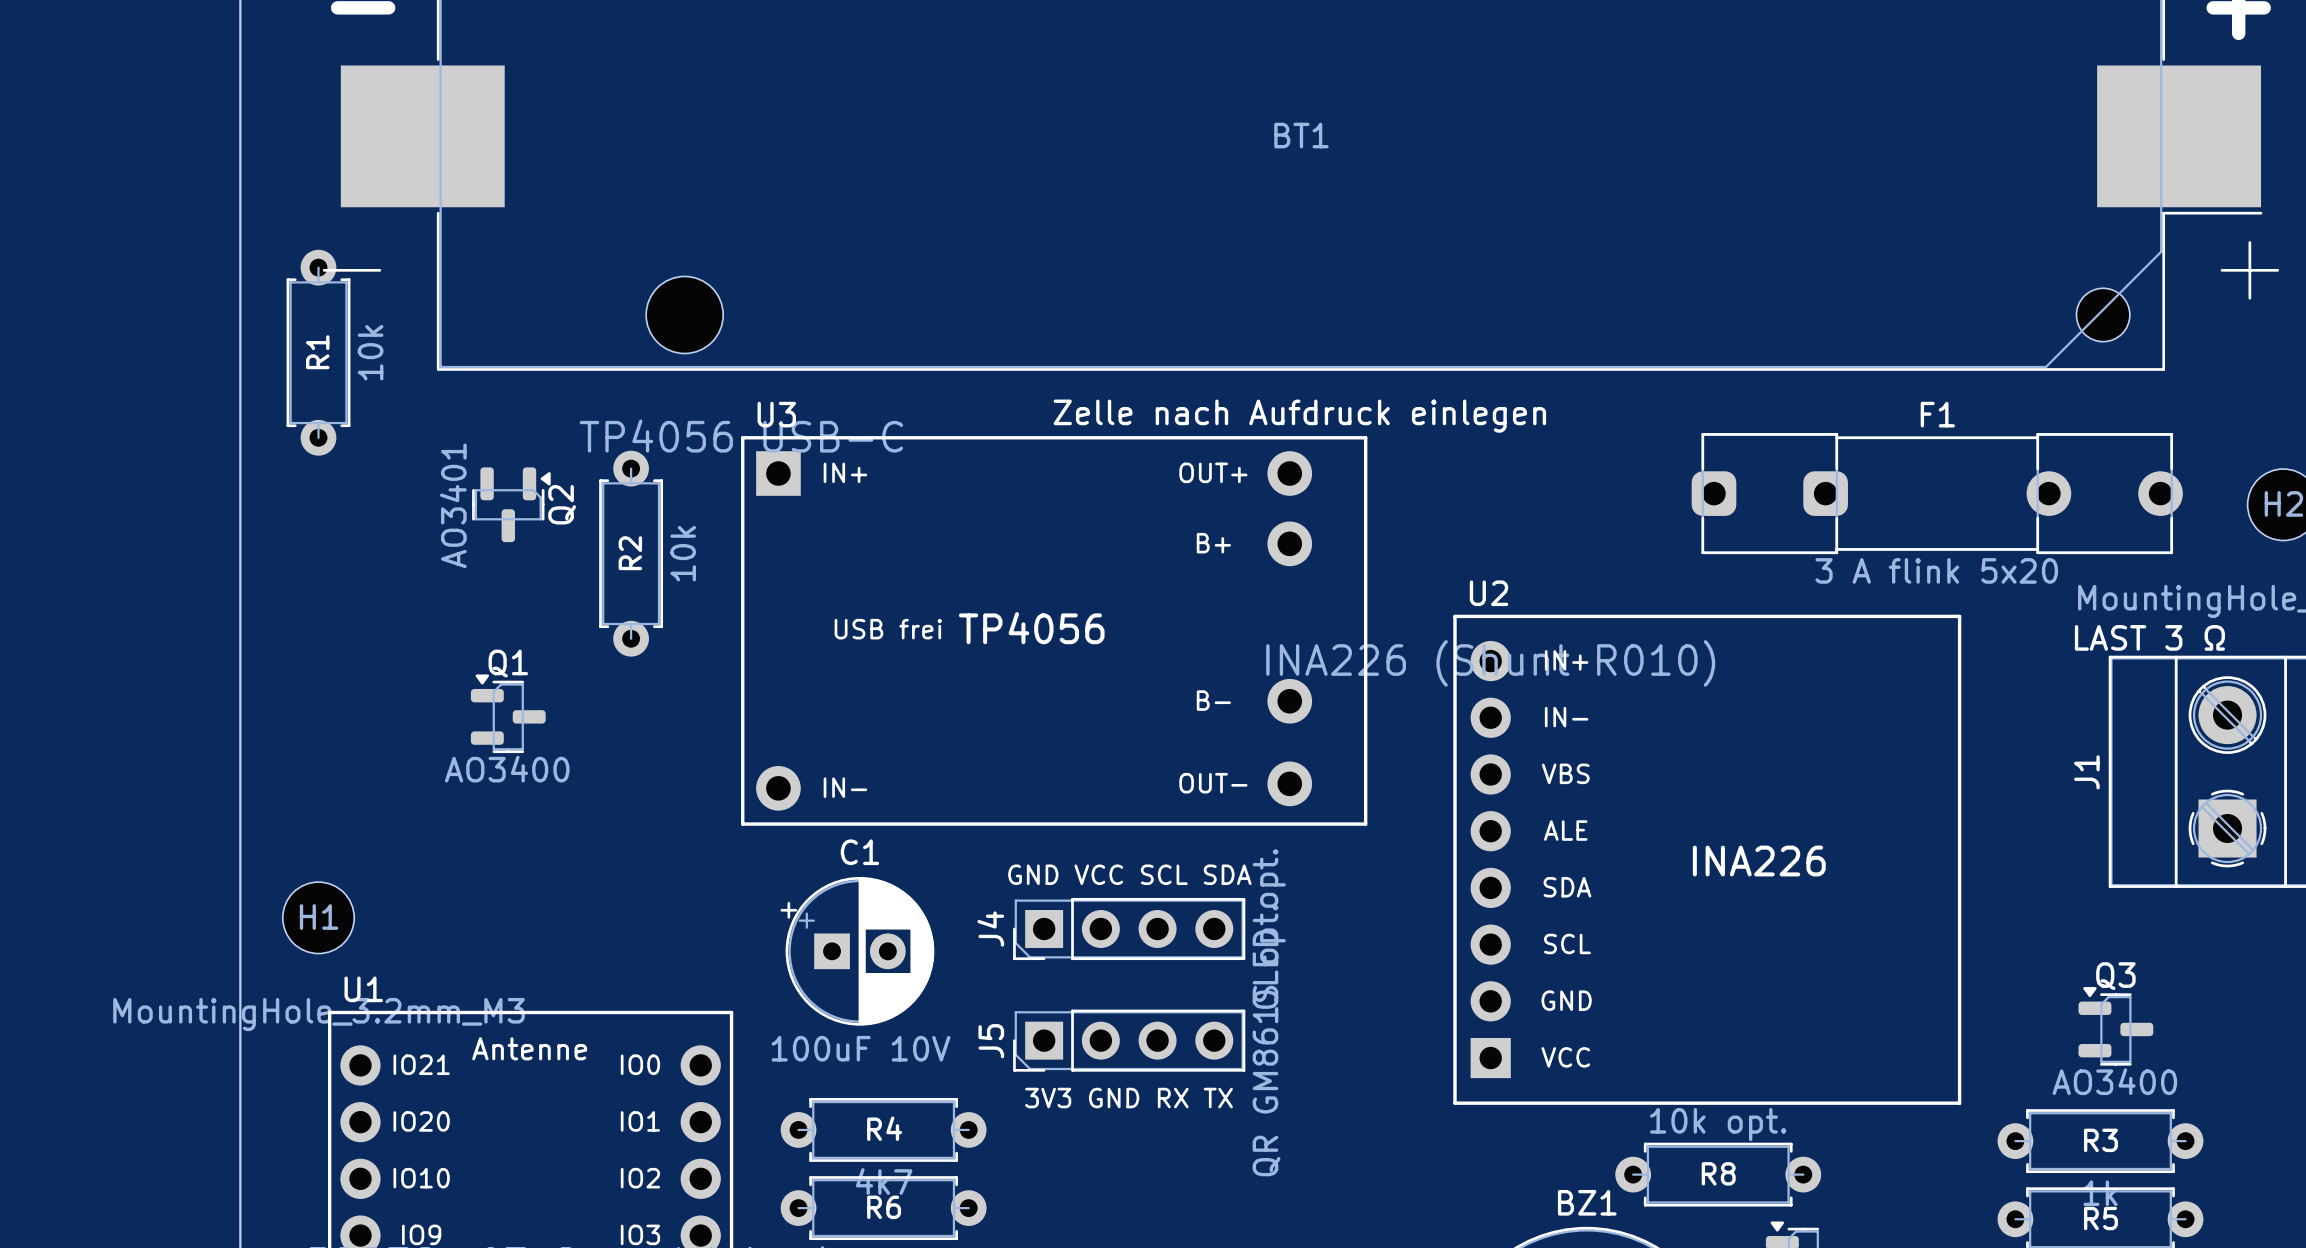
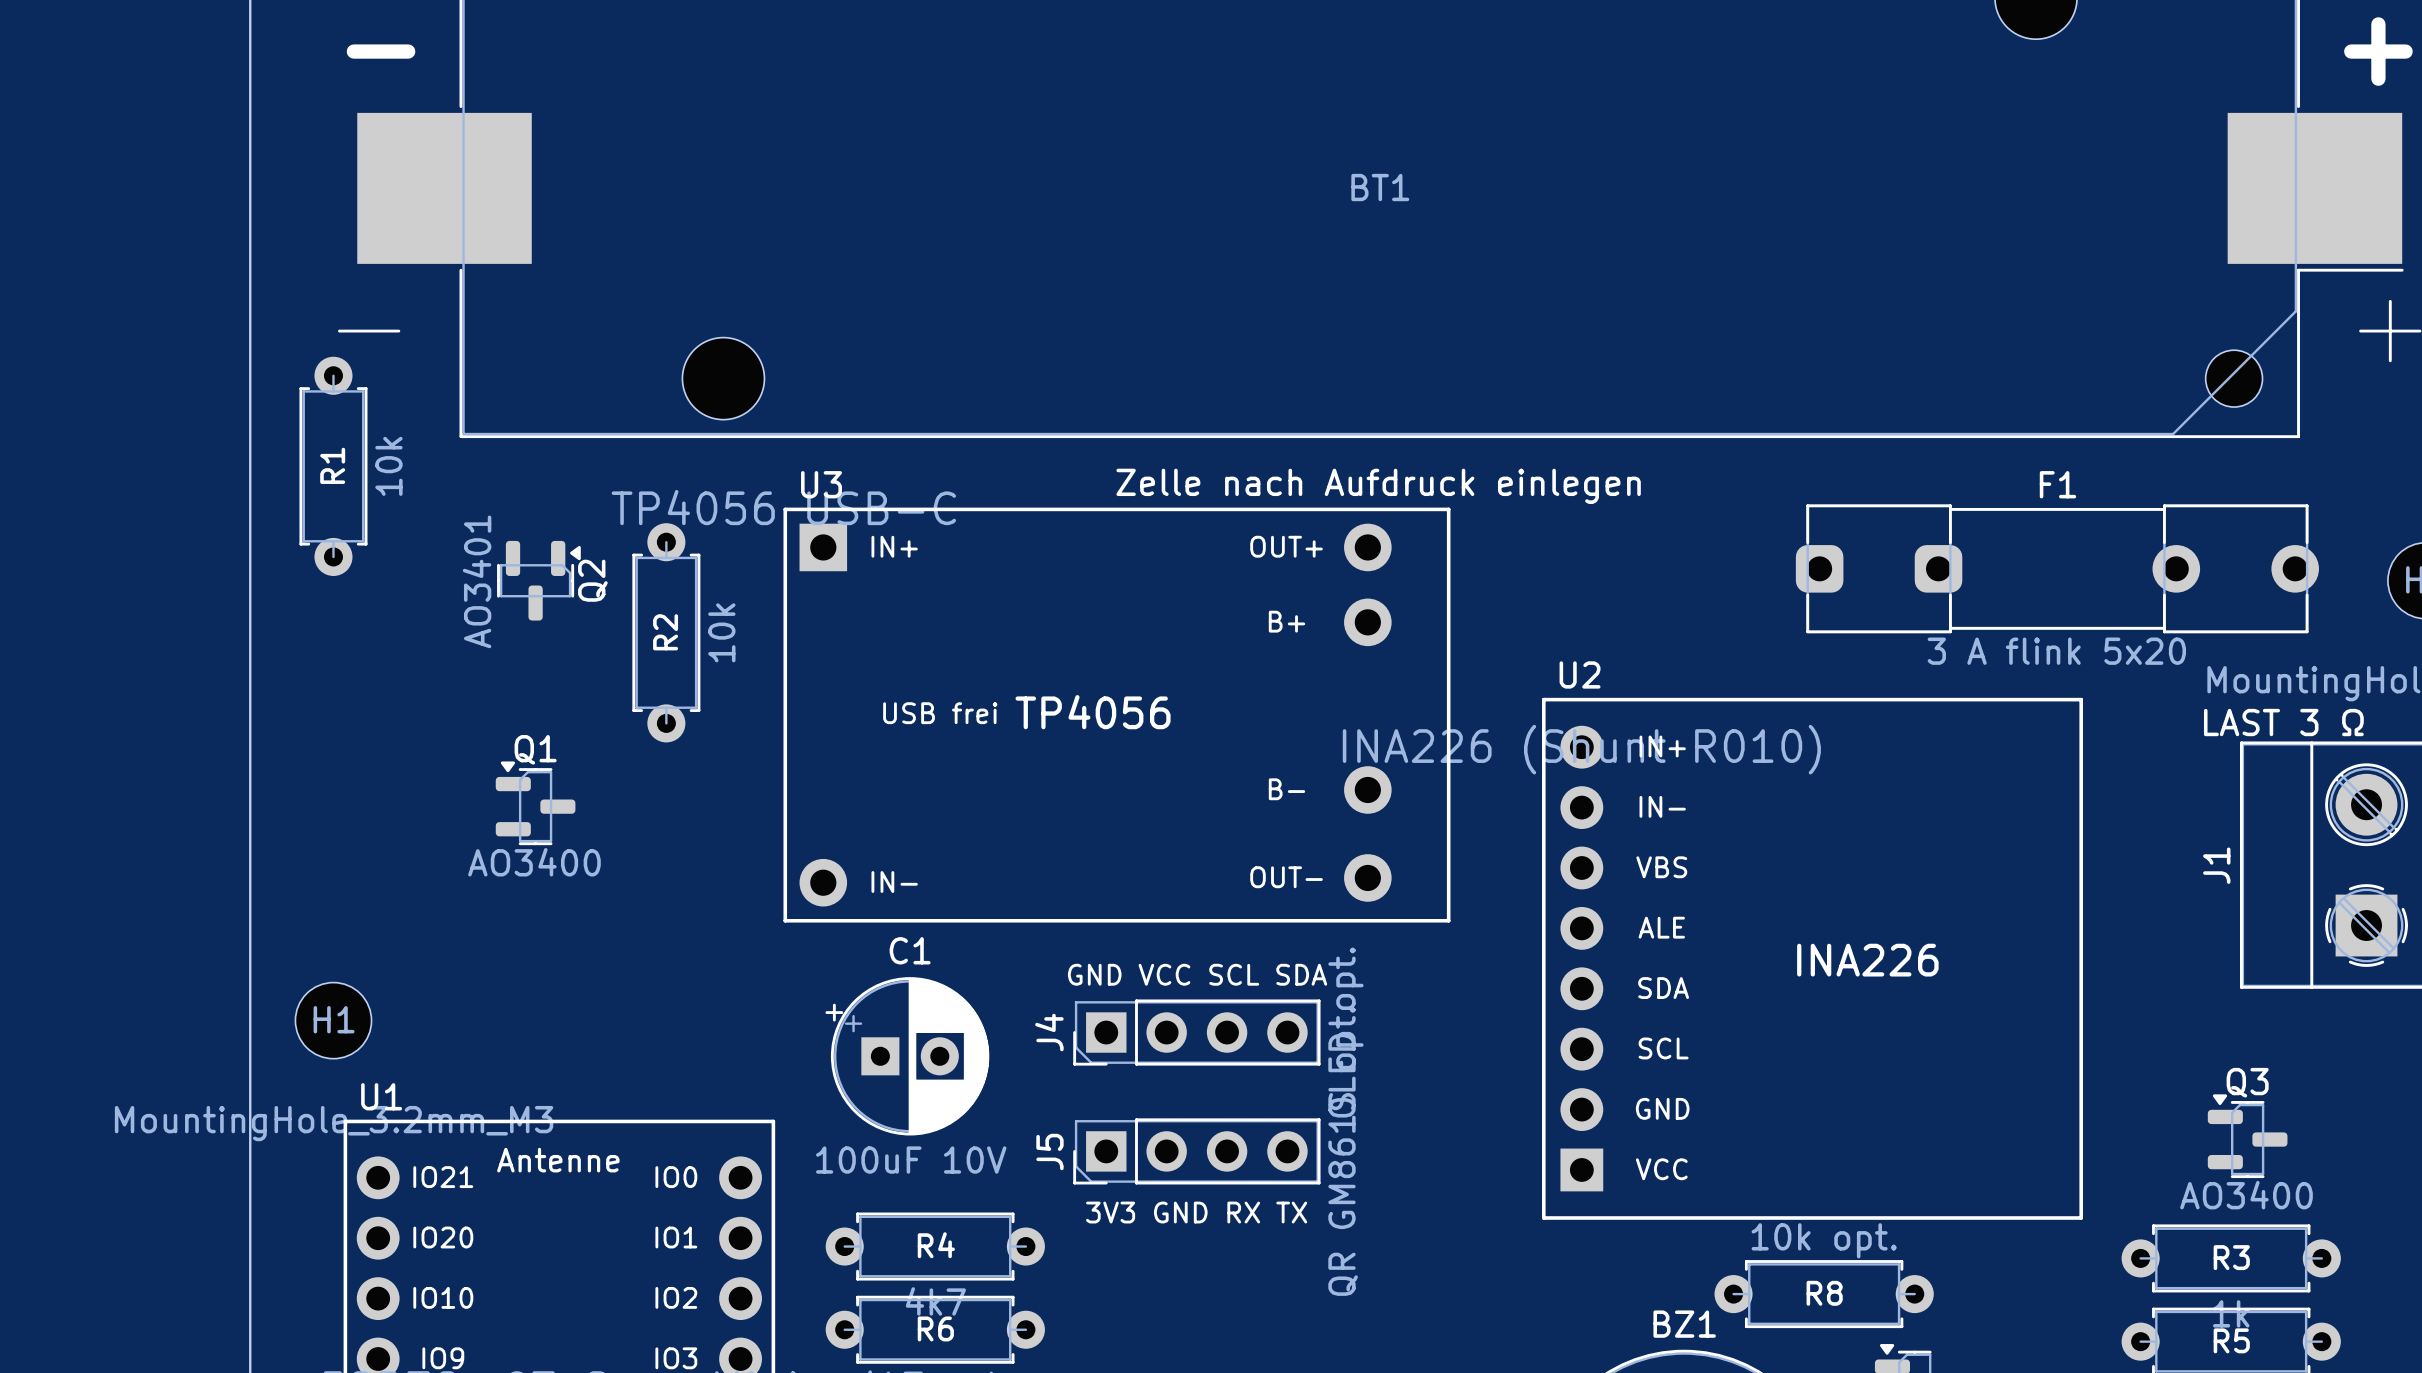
R1 position: (318, 352) -> (333, 466)

